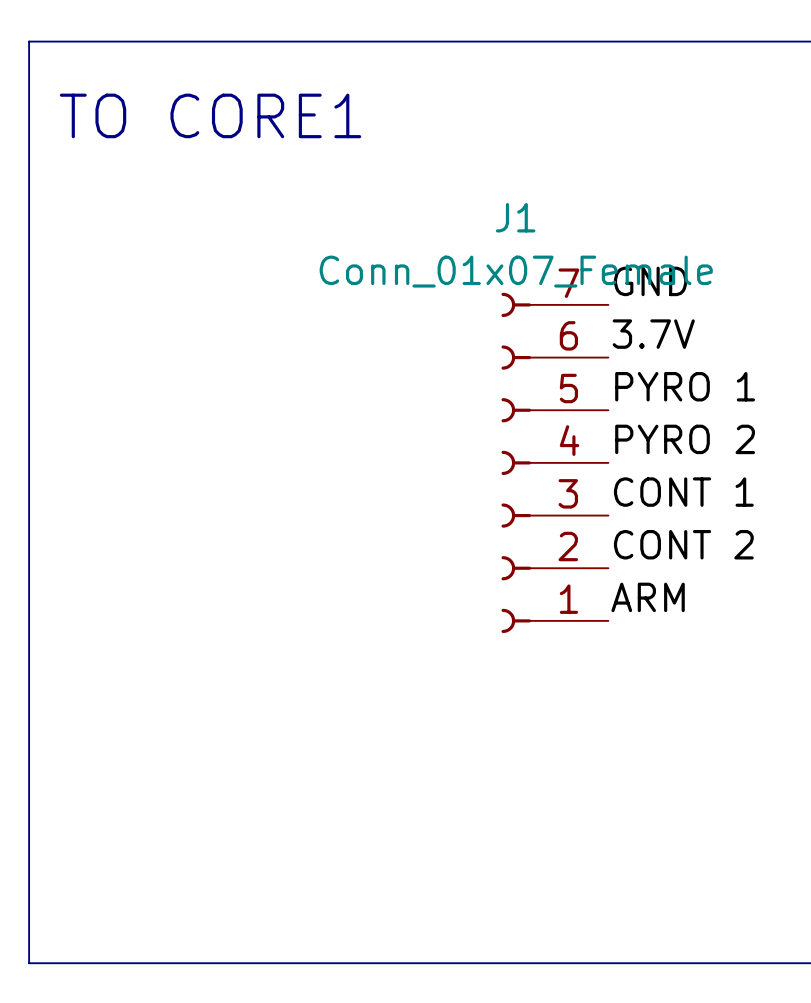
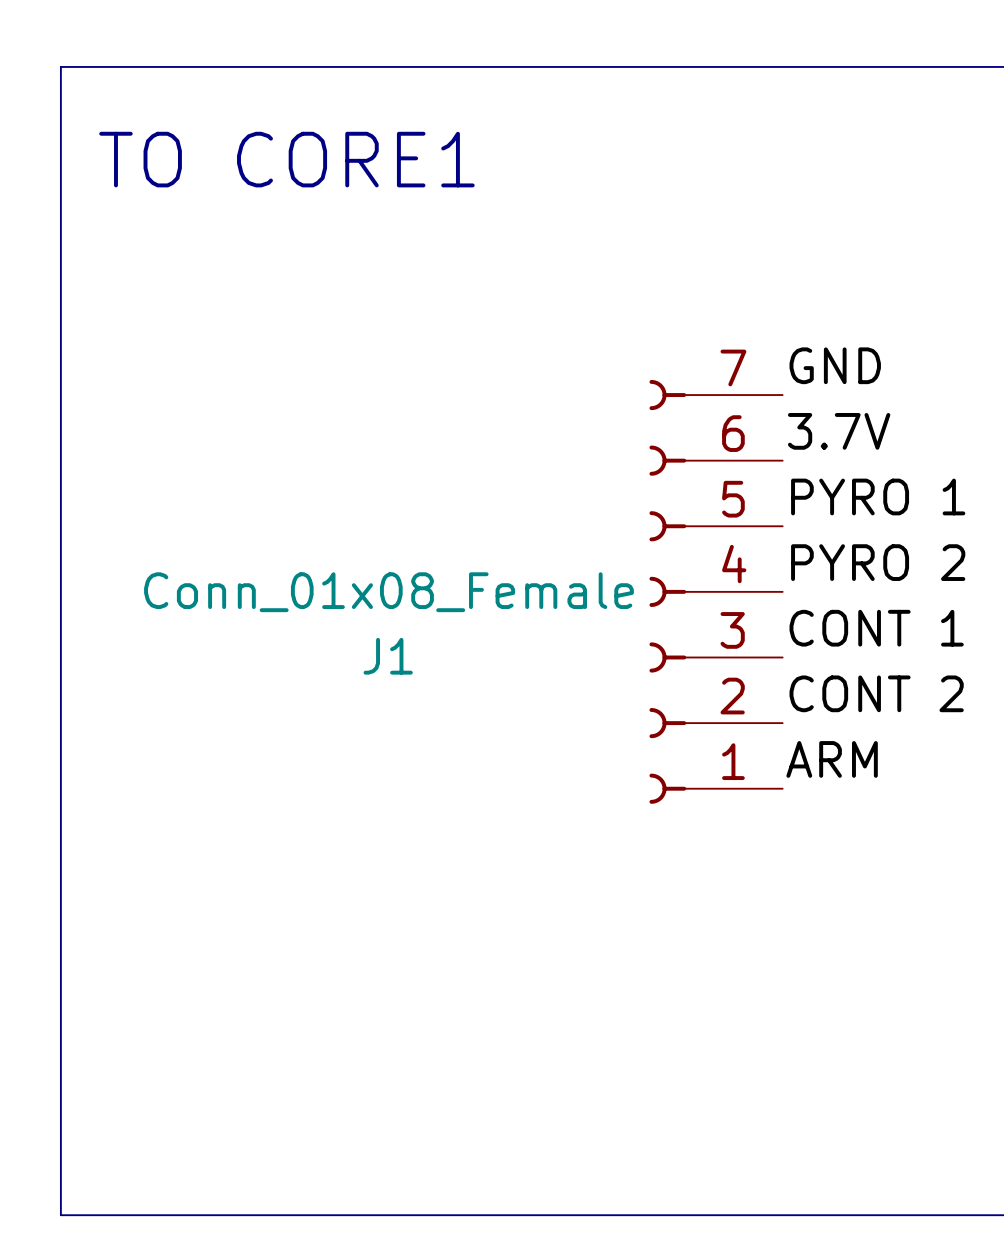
J1 name position: J1 (515, 217) -> J1 (388, 656)
J1 value: Conn_01x07_Female (516, 271) -> Conn_01x08_Female (388, 592)

